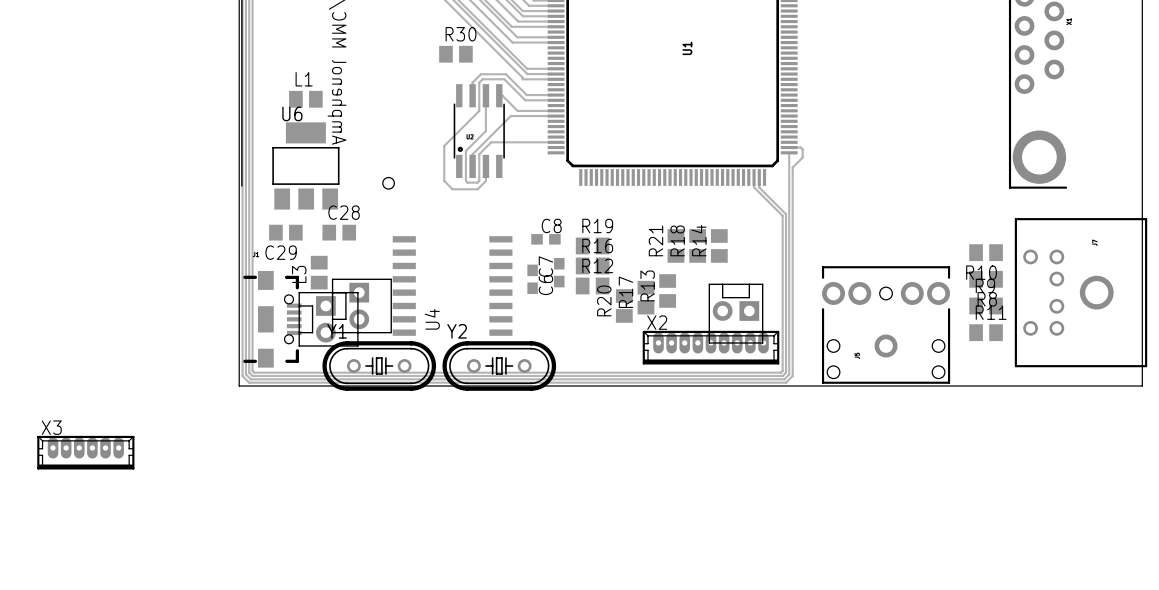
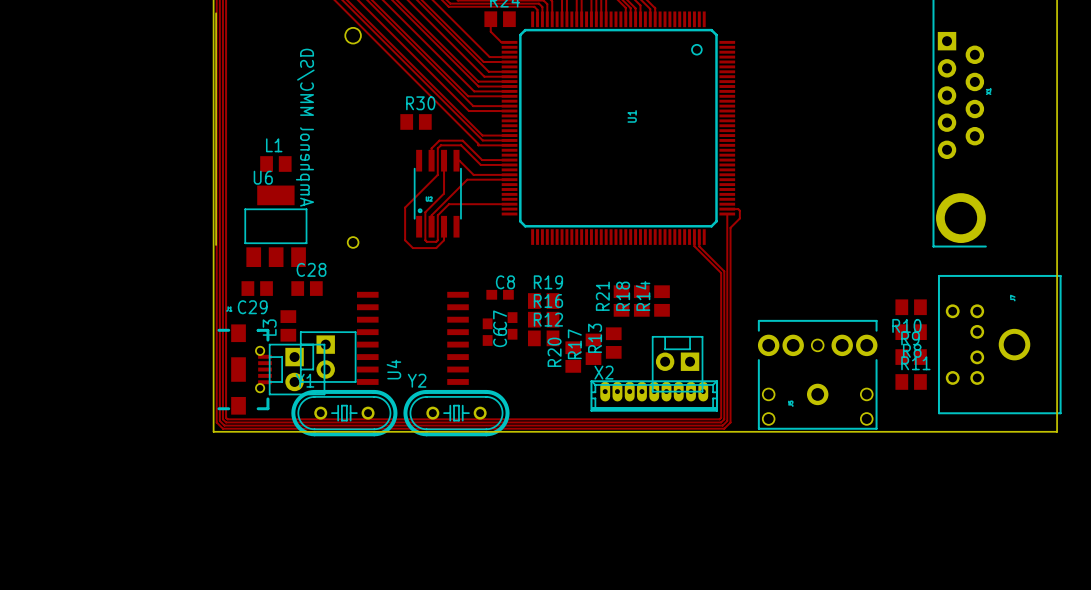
X3: (85, 452) -> none

